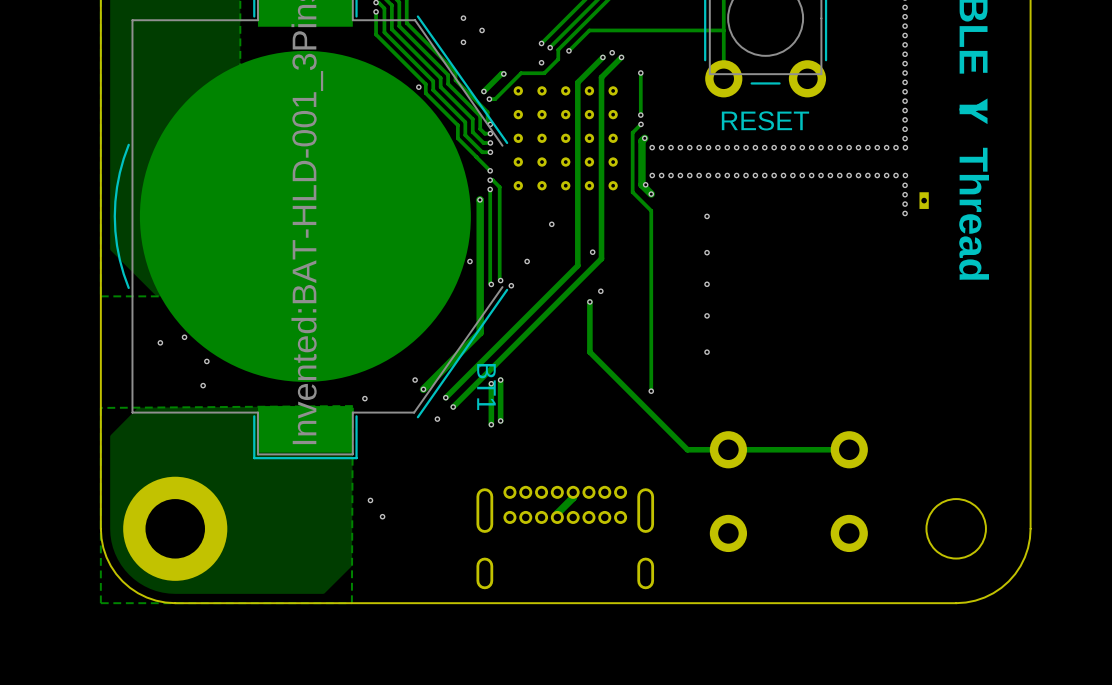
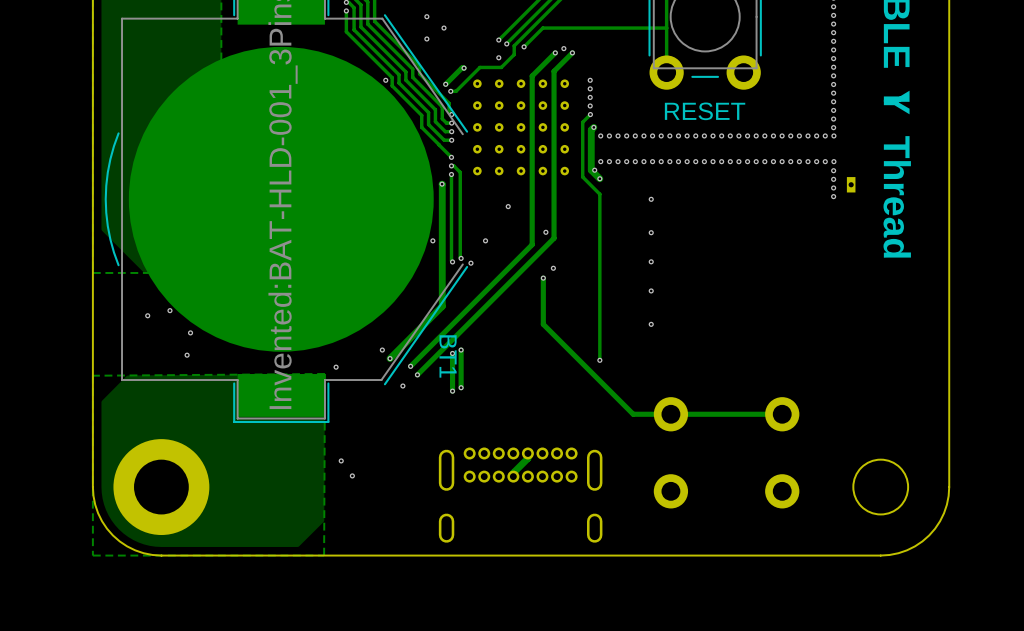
track: (640, 73) (640, 115) -> none
via: (640, 73) -> none
via: none -> (590, 80)
via: none -> (590, 88)
via: none -> (590, 97)

